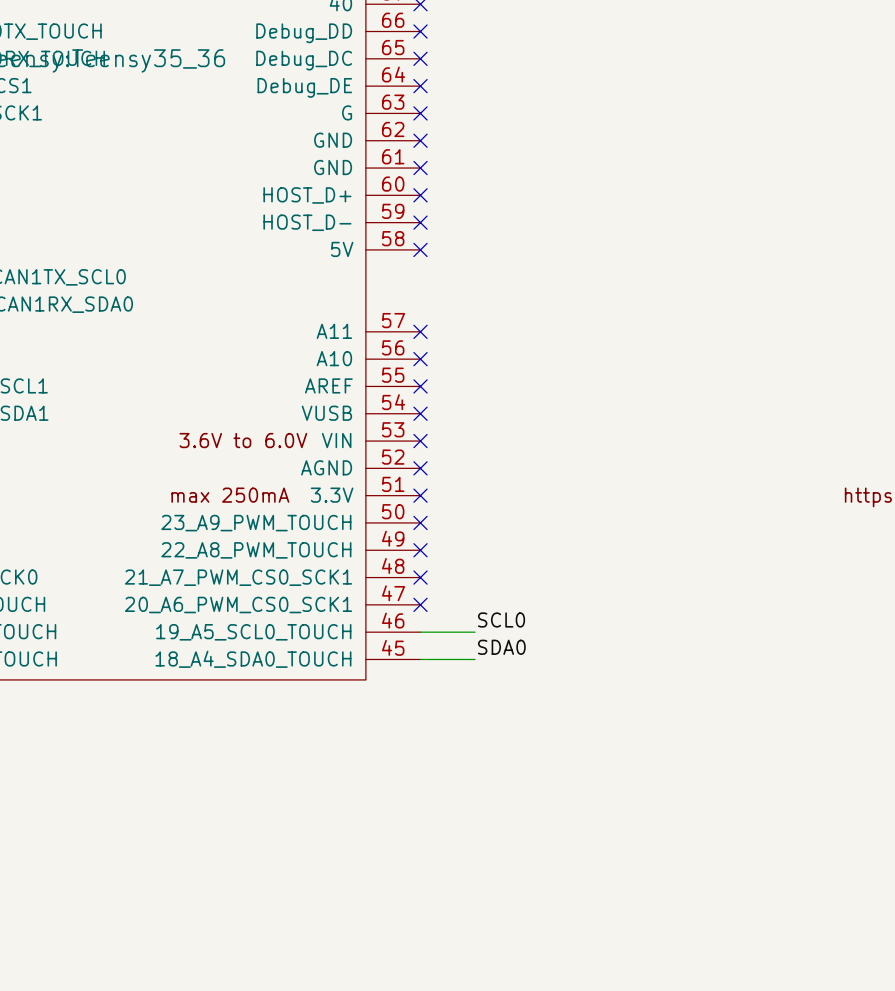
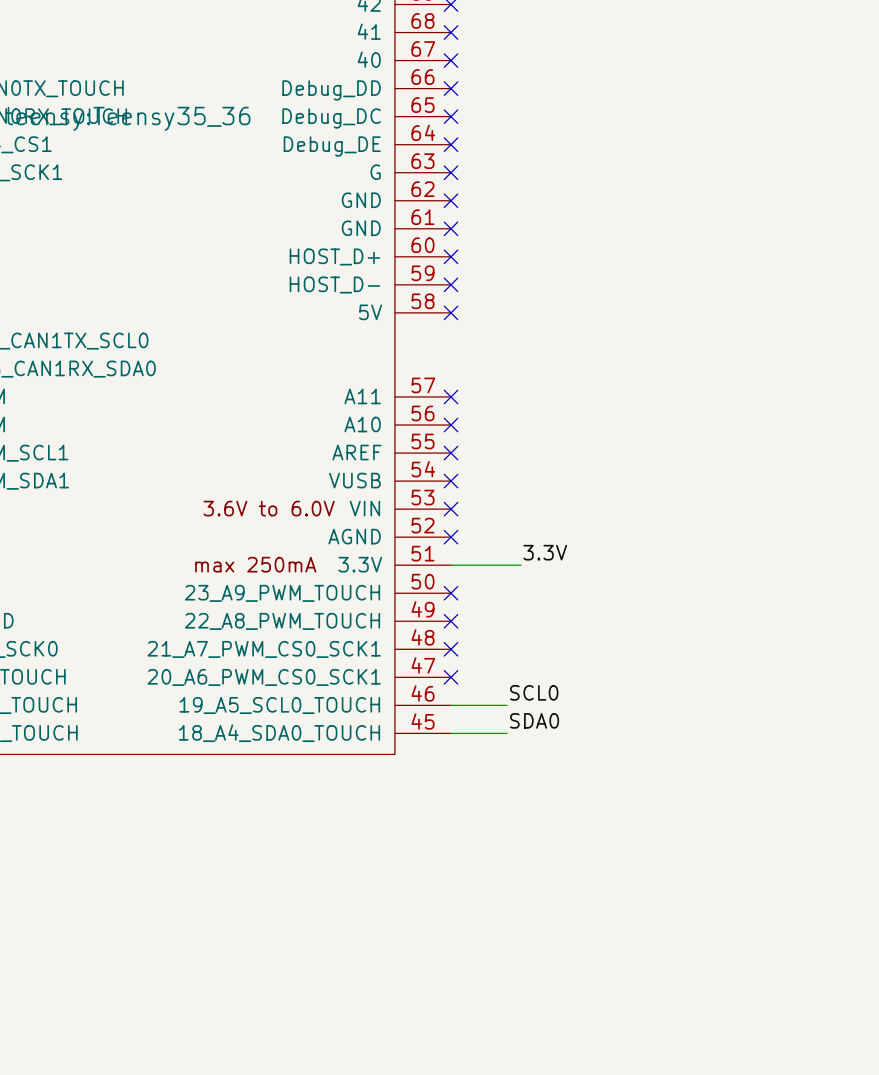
label: none -> 3.3V (545, 552)
wire: none -> (451, 565) (521, 565)
no-connect mark: (420, 495) -> none

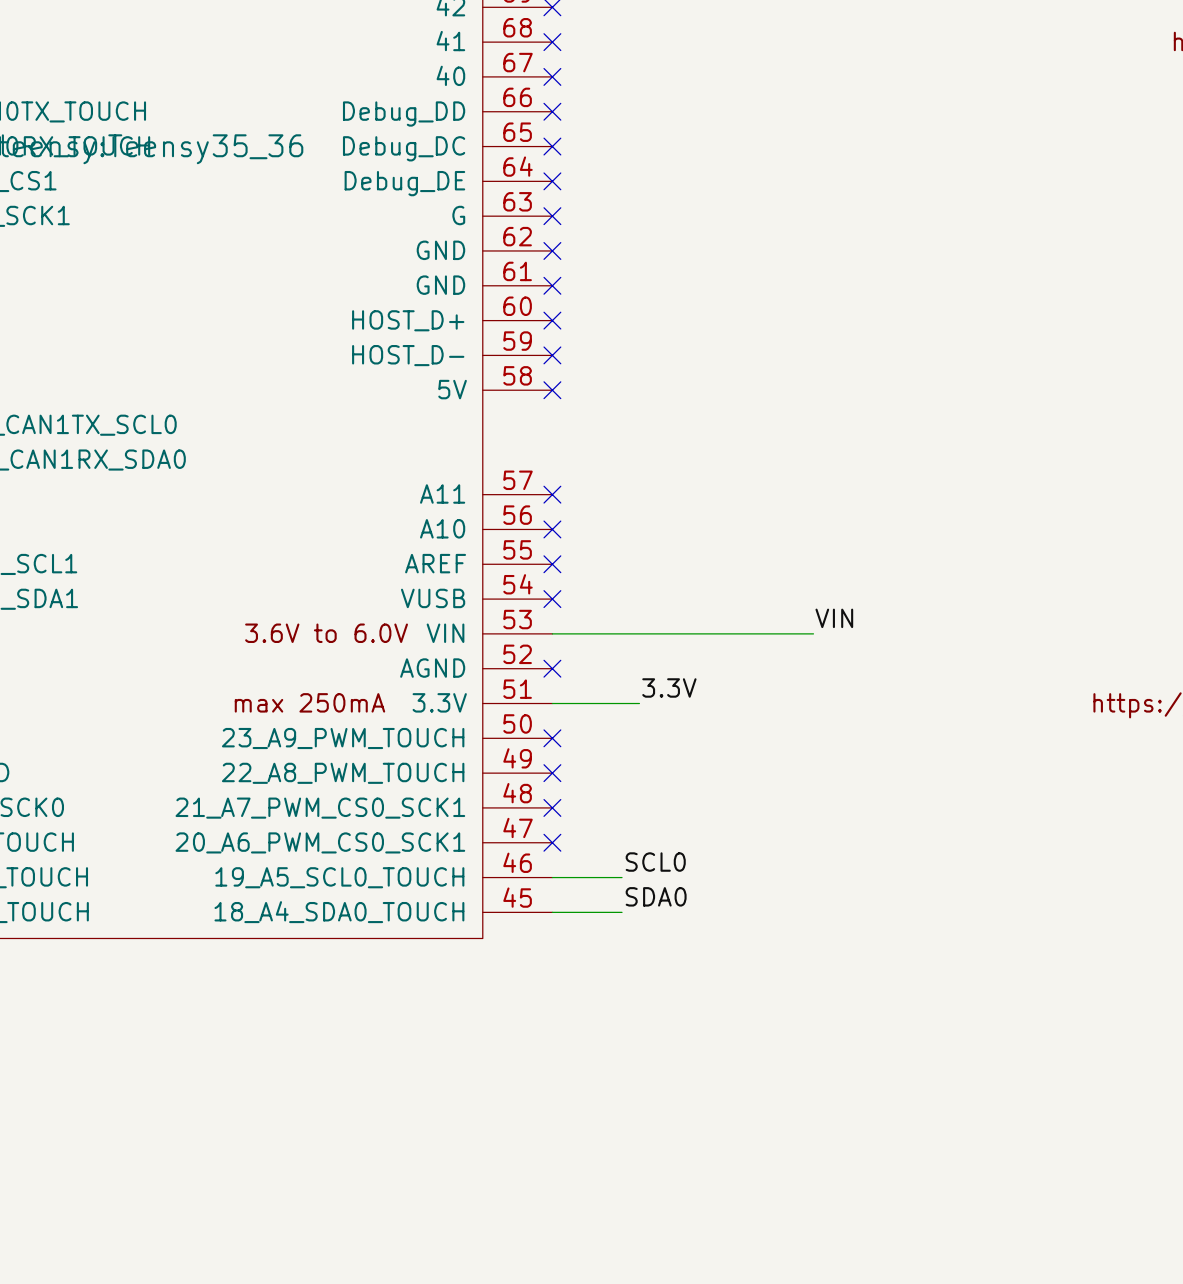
label: none -> VIN (834, 618)
wire: none -> (552, 633) (813, 633)
no-connect mark: (451, 509) -> none

